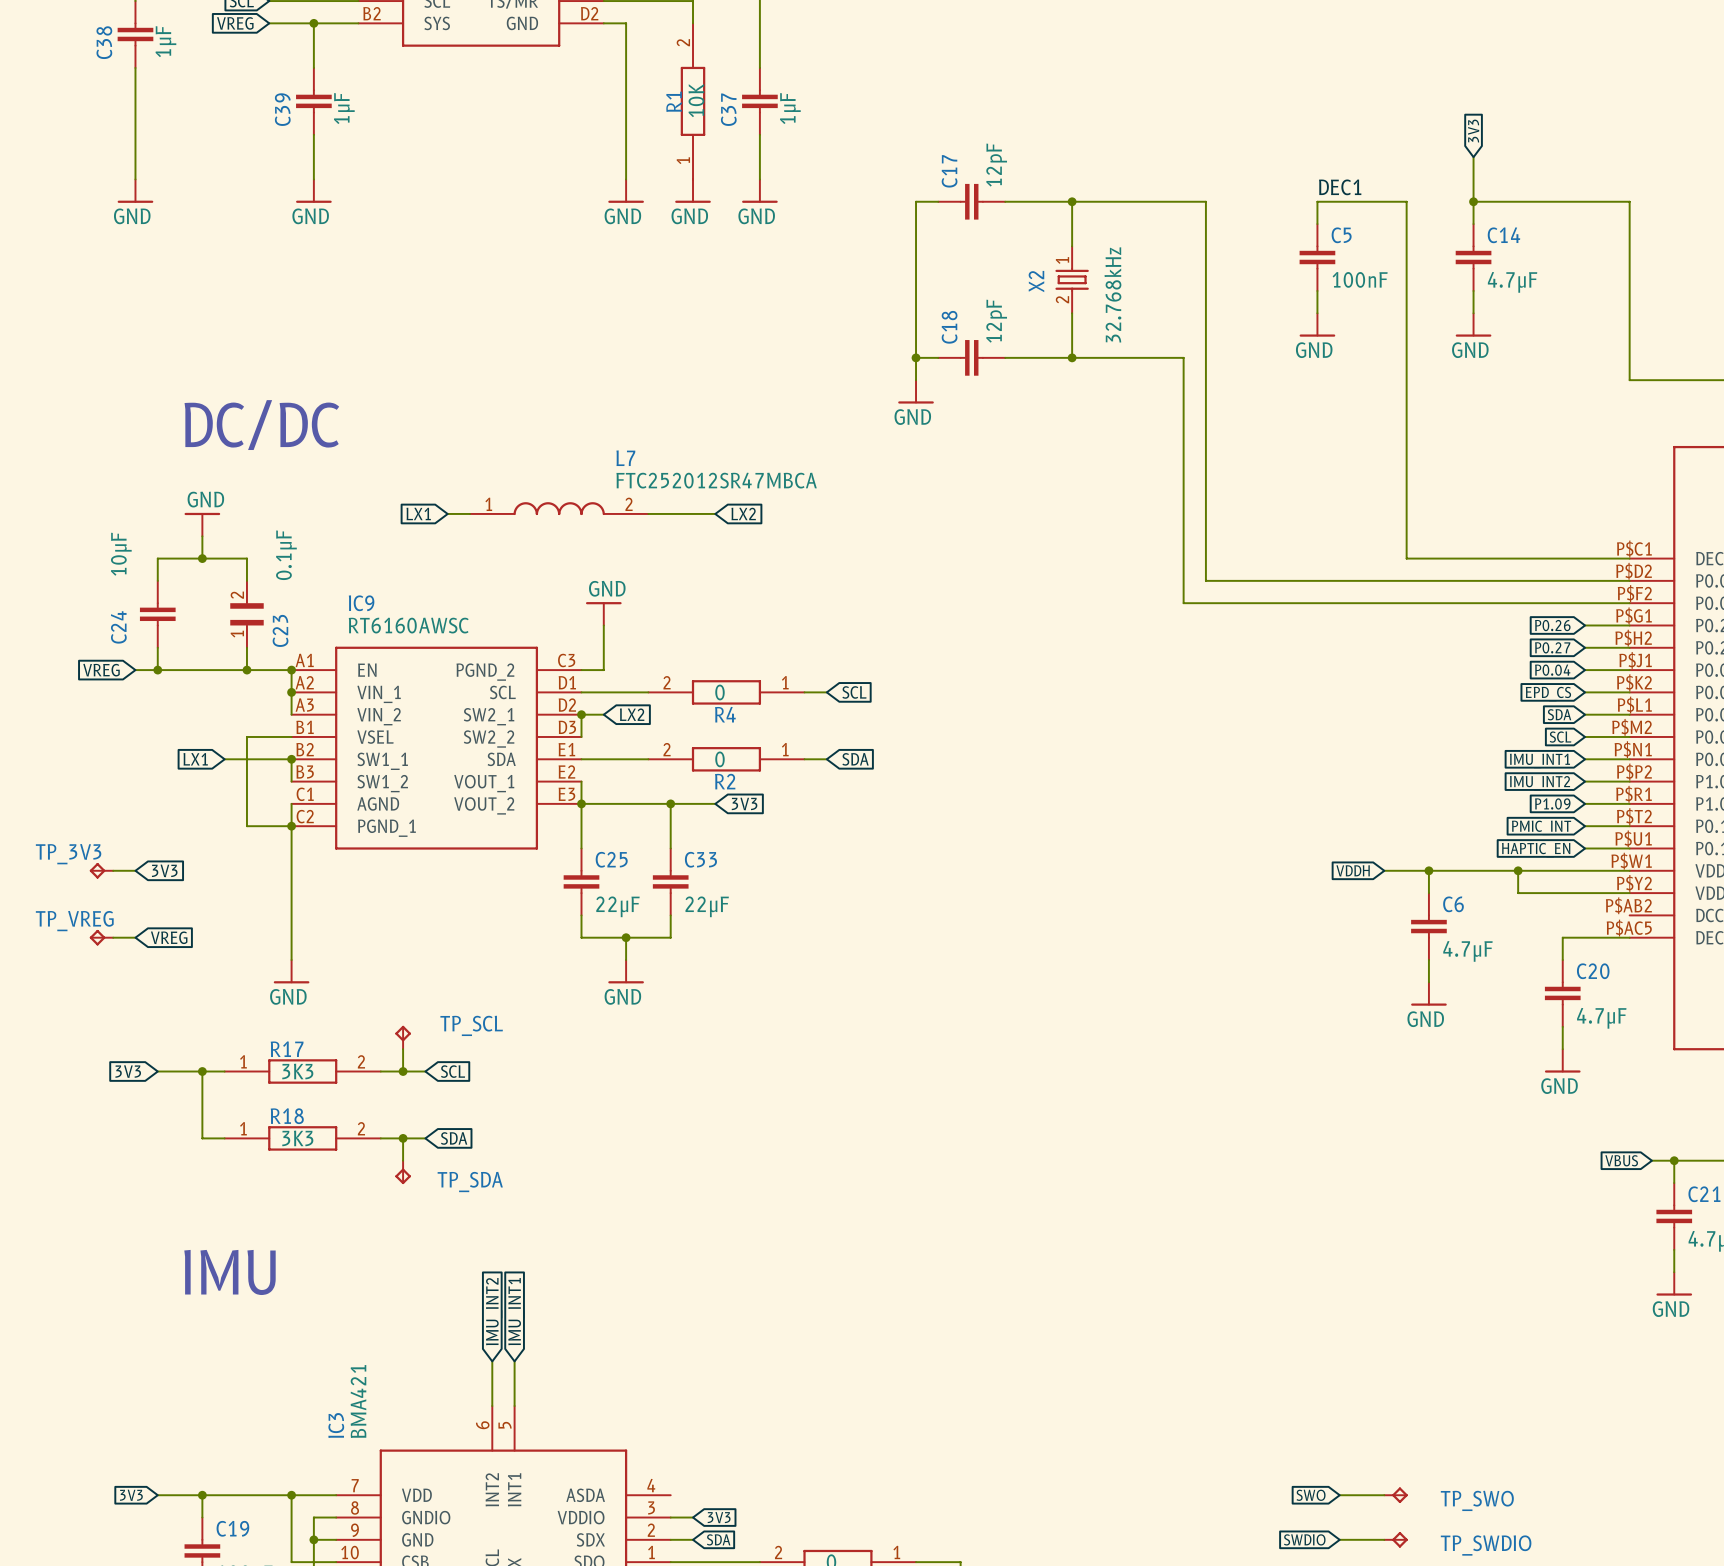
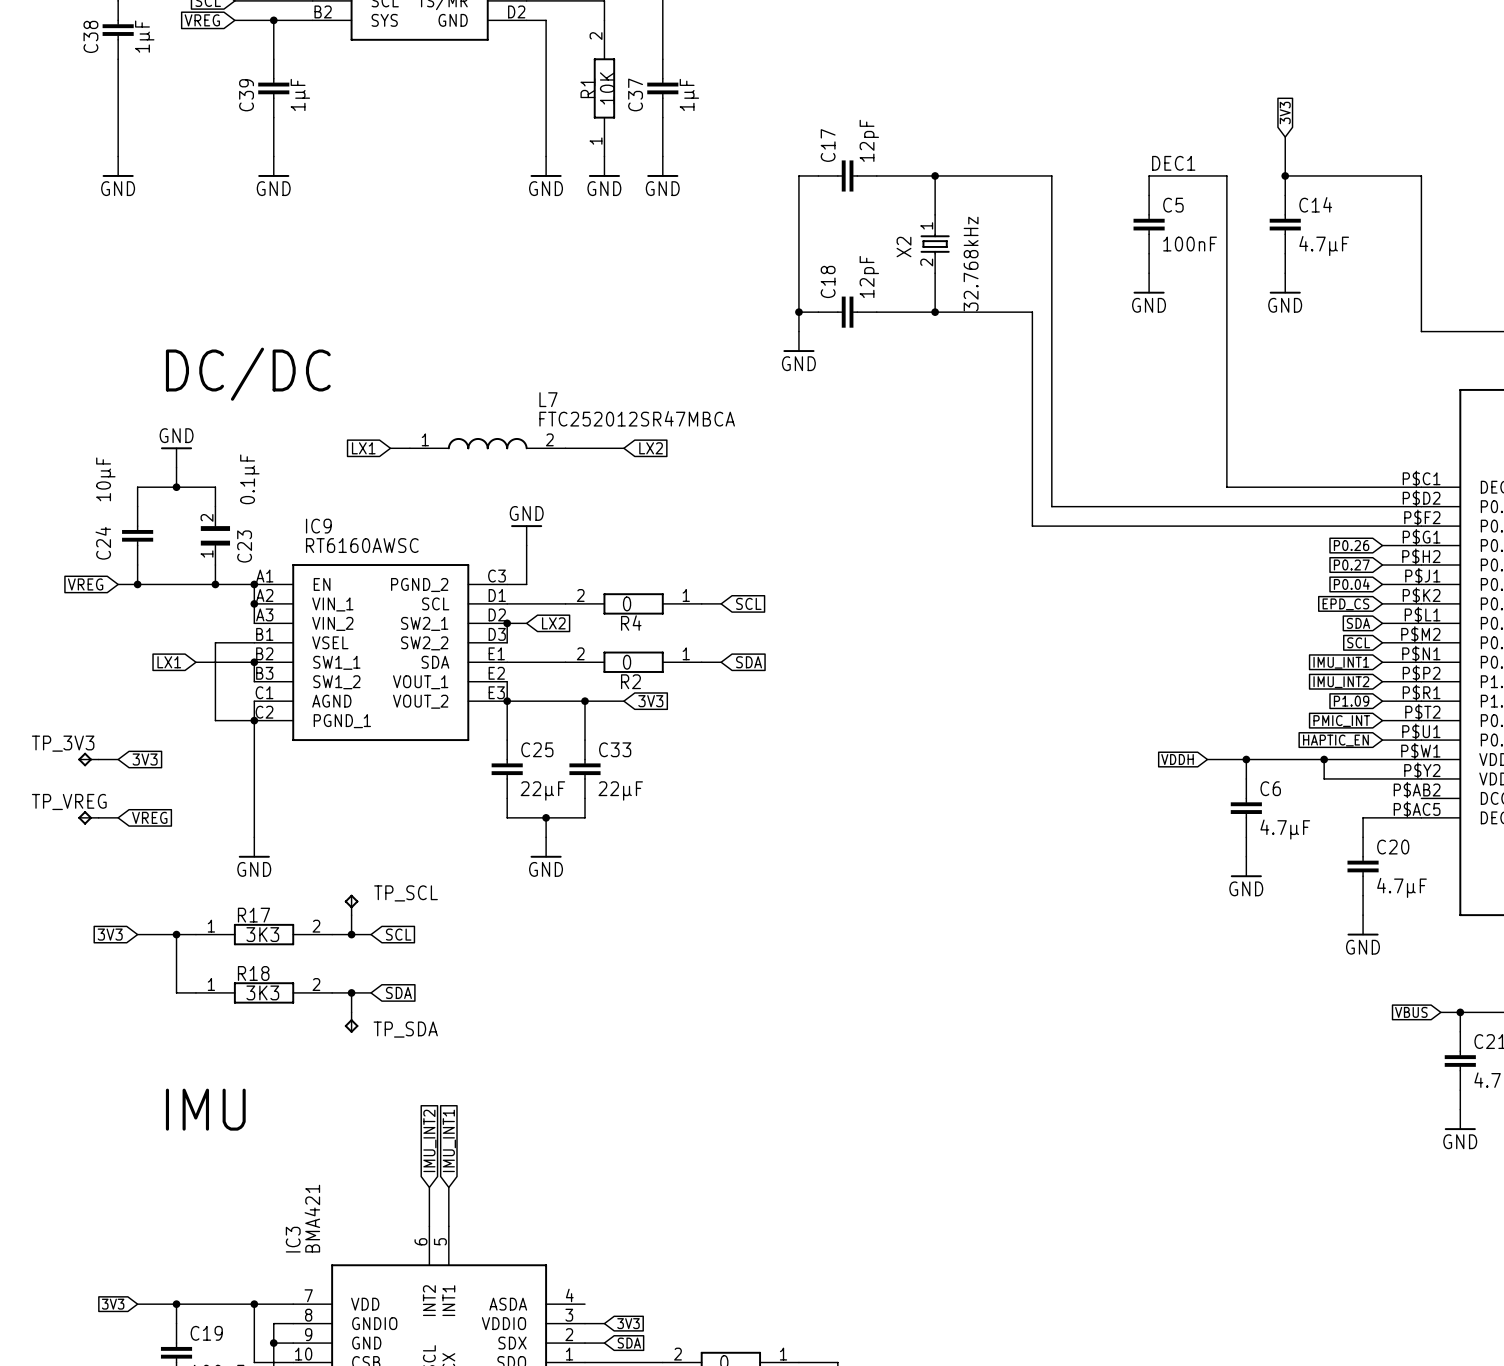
global label: SWO (1311, 1495) -> none
wire: (1339, 1495) (1384, 1495) -> none
TP_SWO: (1396, 1495) -> none
global label: SWDIO (1304, 1539) -> none
wire: (1339, 1539) (1384, 1539) -> none
TP_SWDIO: (1396, 1539) -> none

